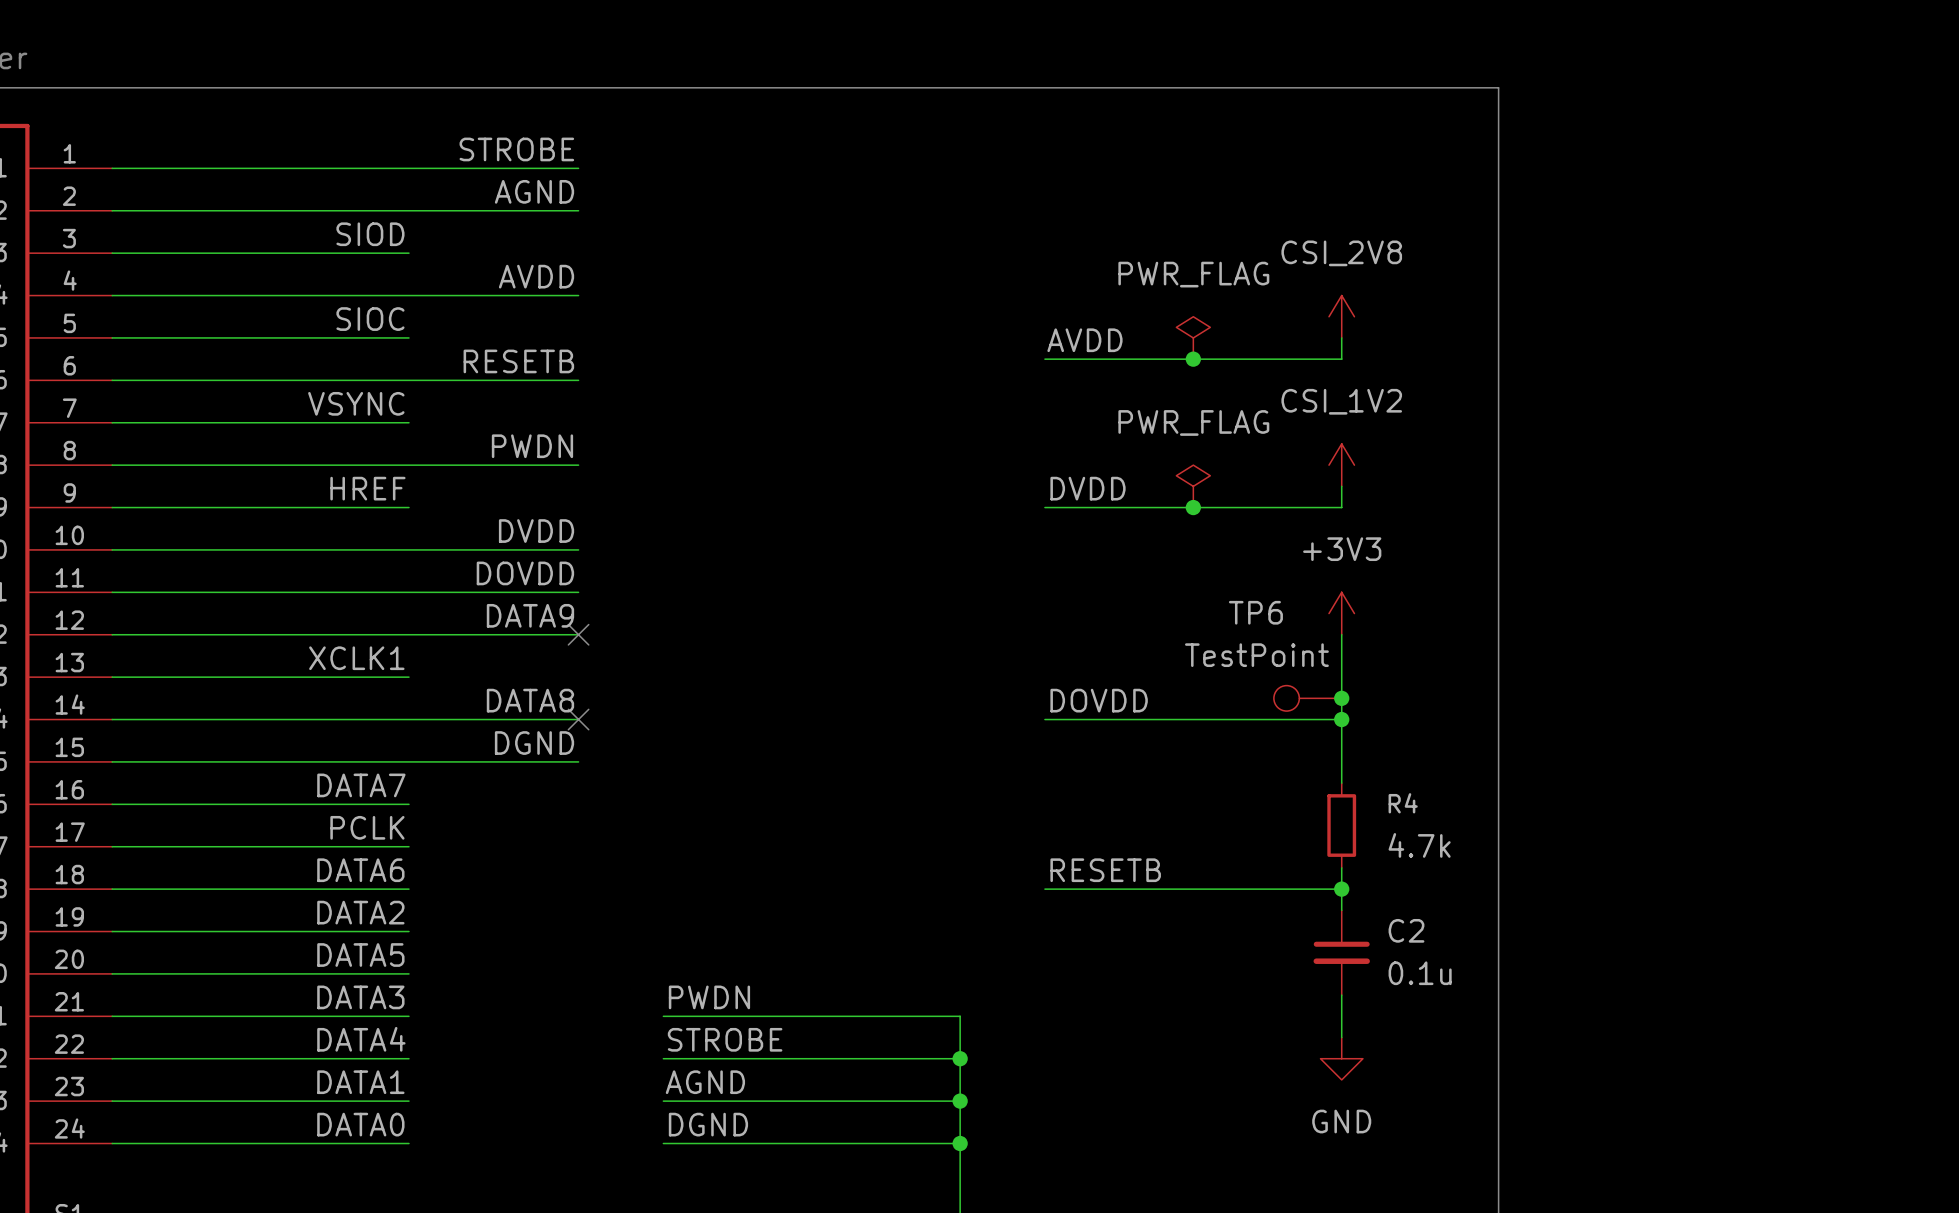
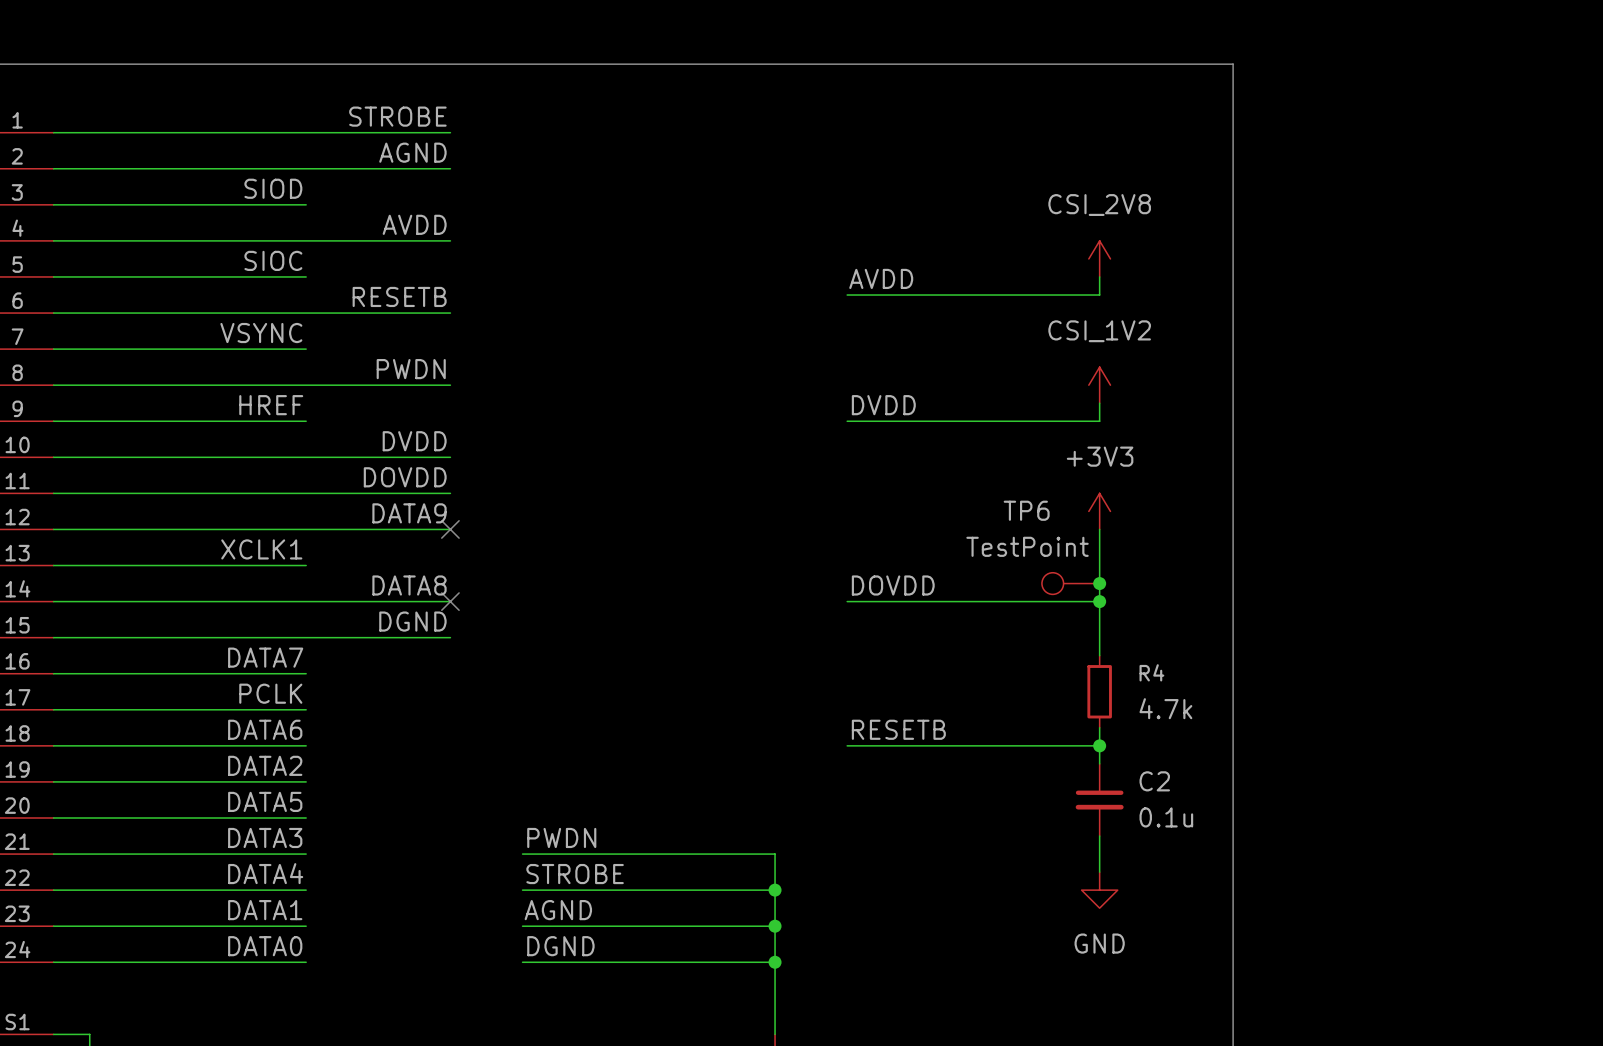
power symbol: PWR_FLAG (1193, 337) -> none
junction: (1193, 359) -> none
power symbol: PWR_FLAG (1193, 486) -> none
junction: (1193, 507) -> none

